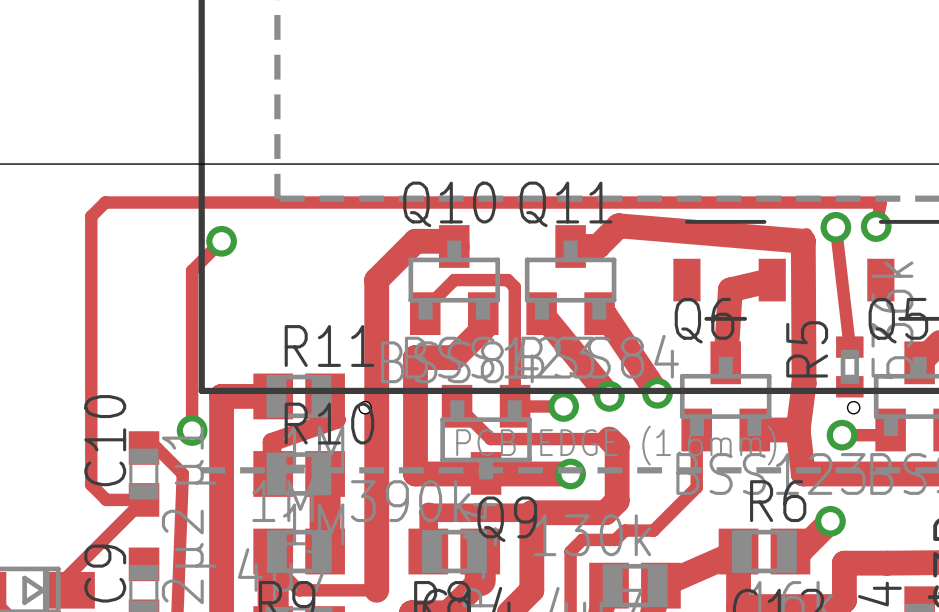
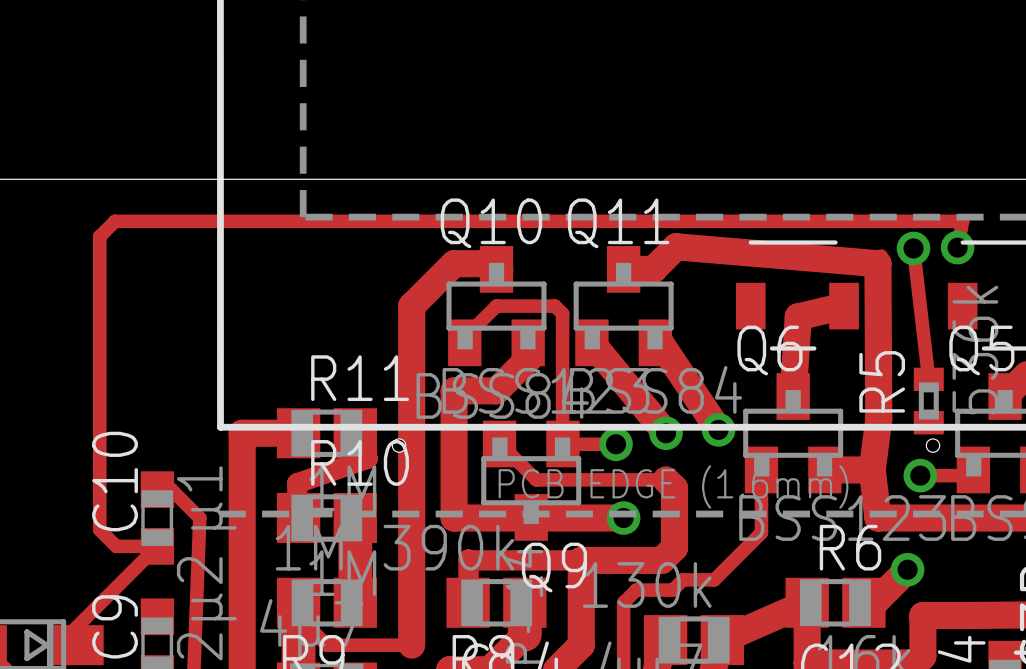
track: (221, 241) (192, 270) (192, 430) -> none
via: (221, 241) -> none
via: (192, 430) -> none

